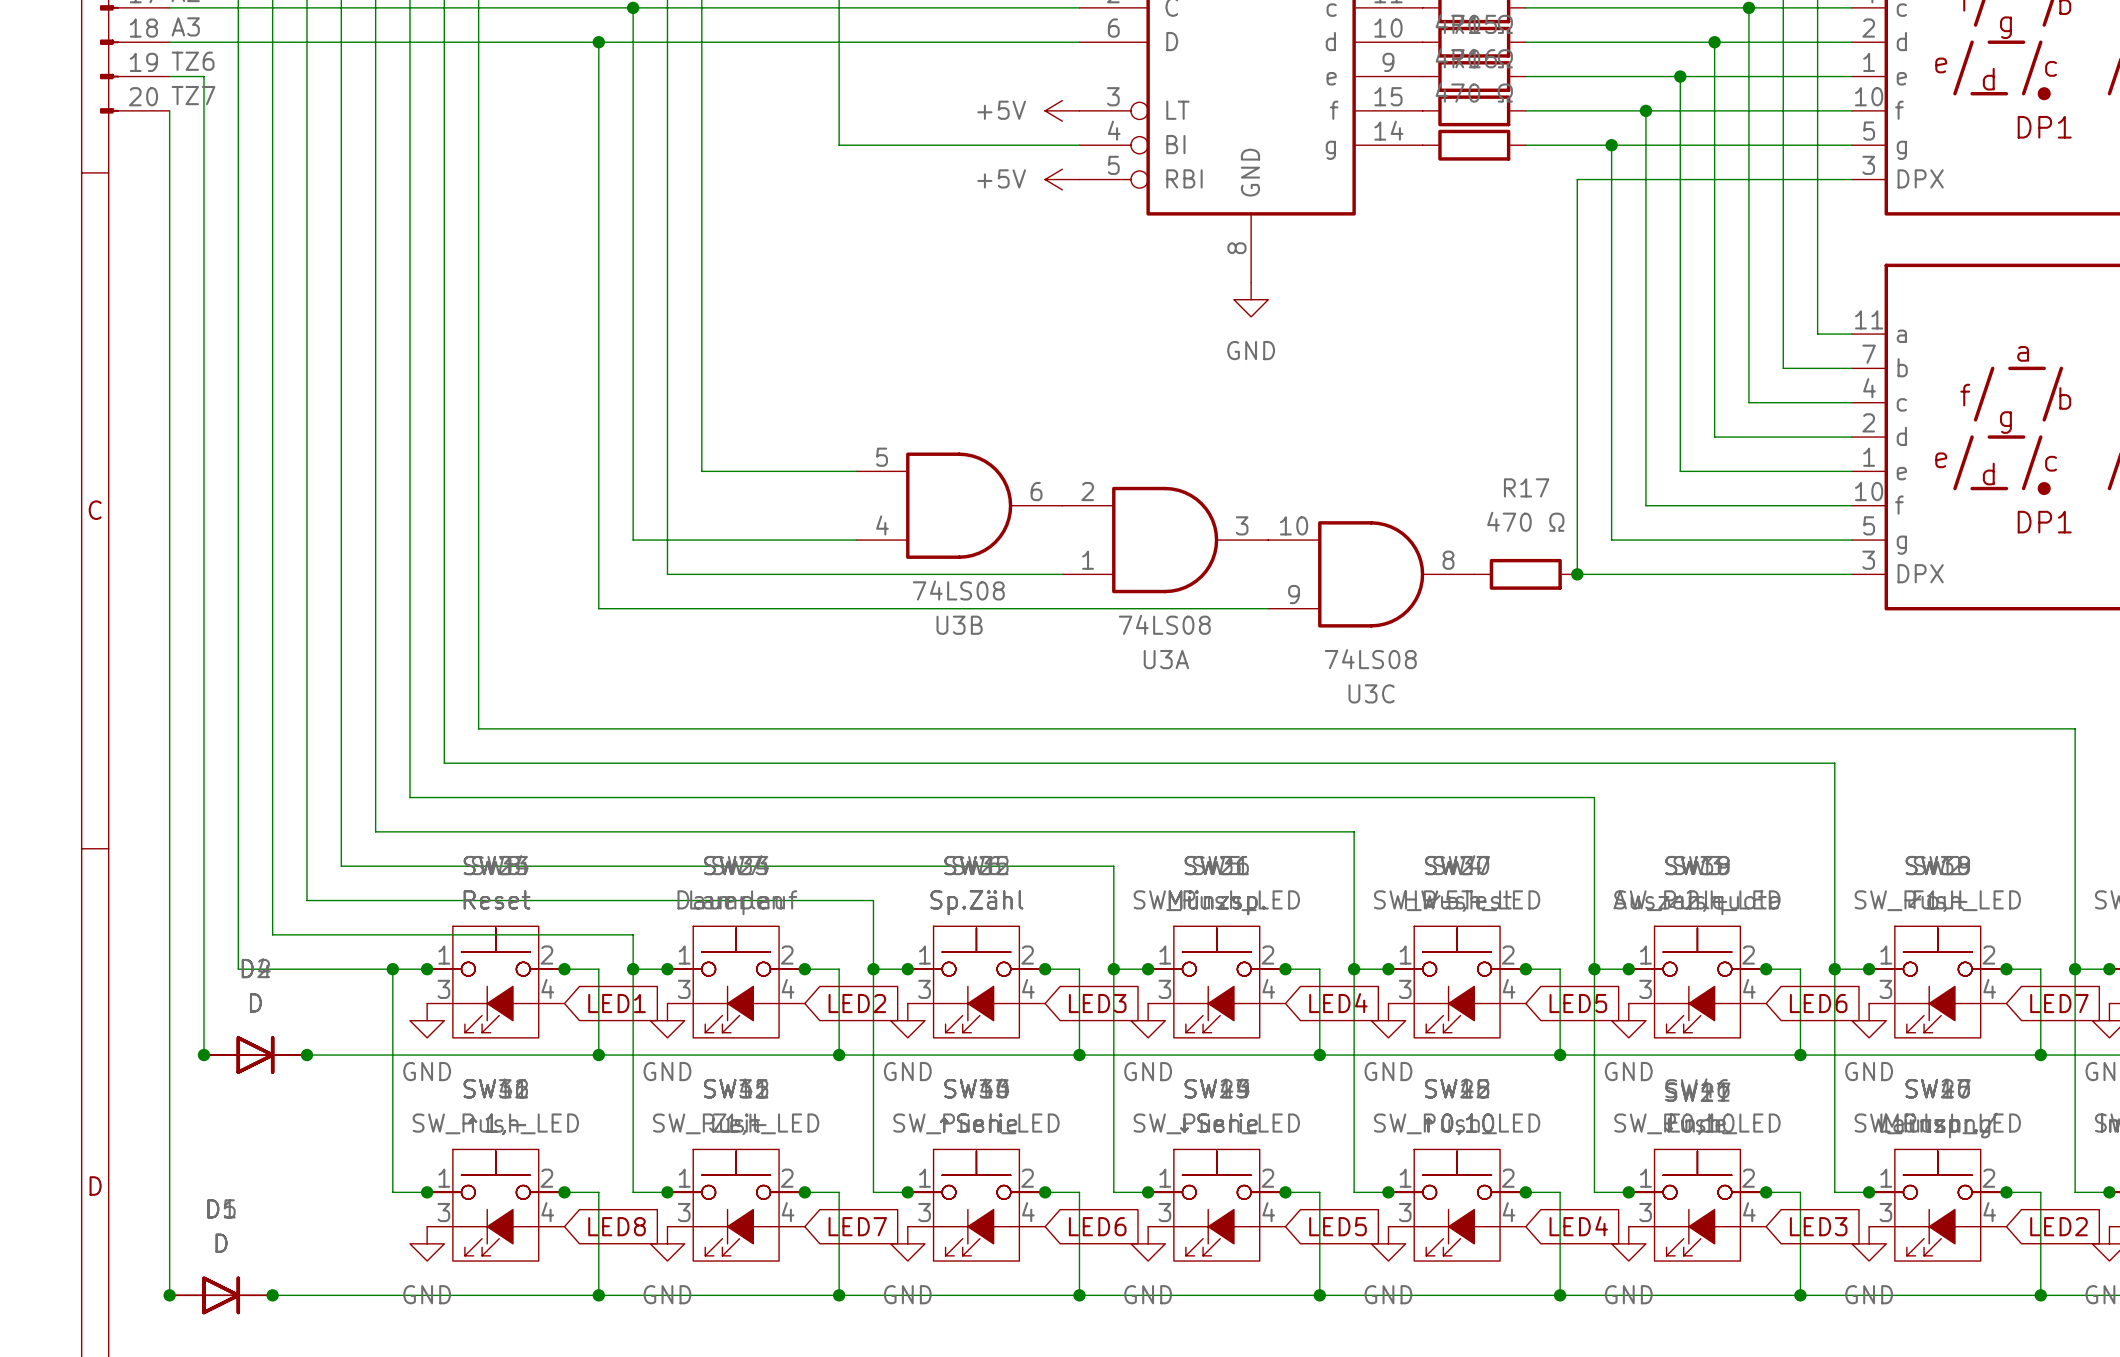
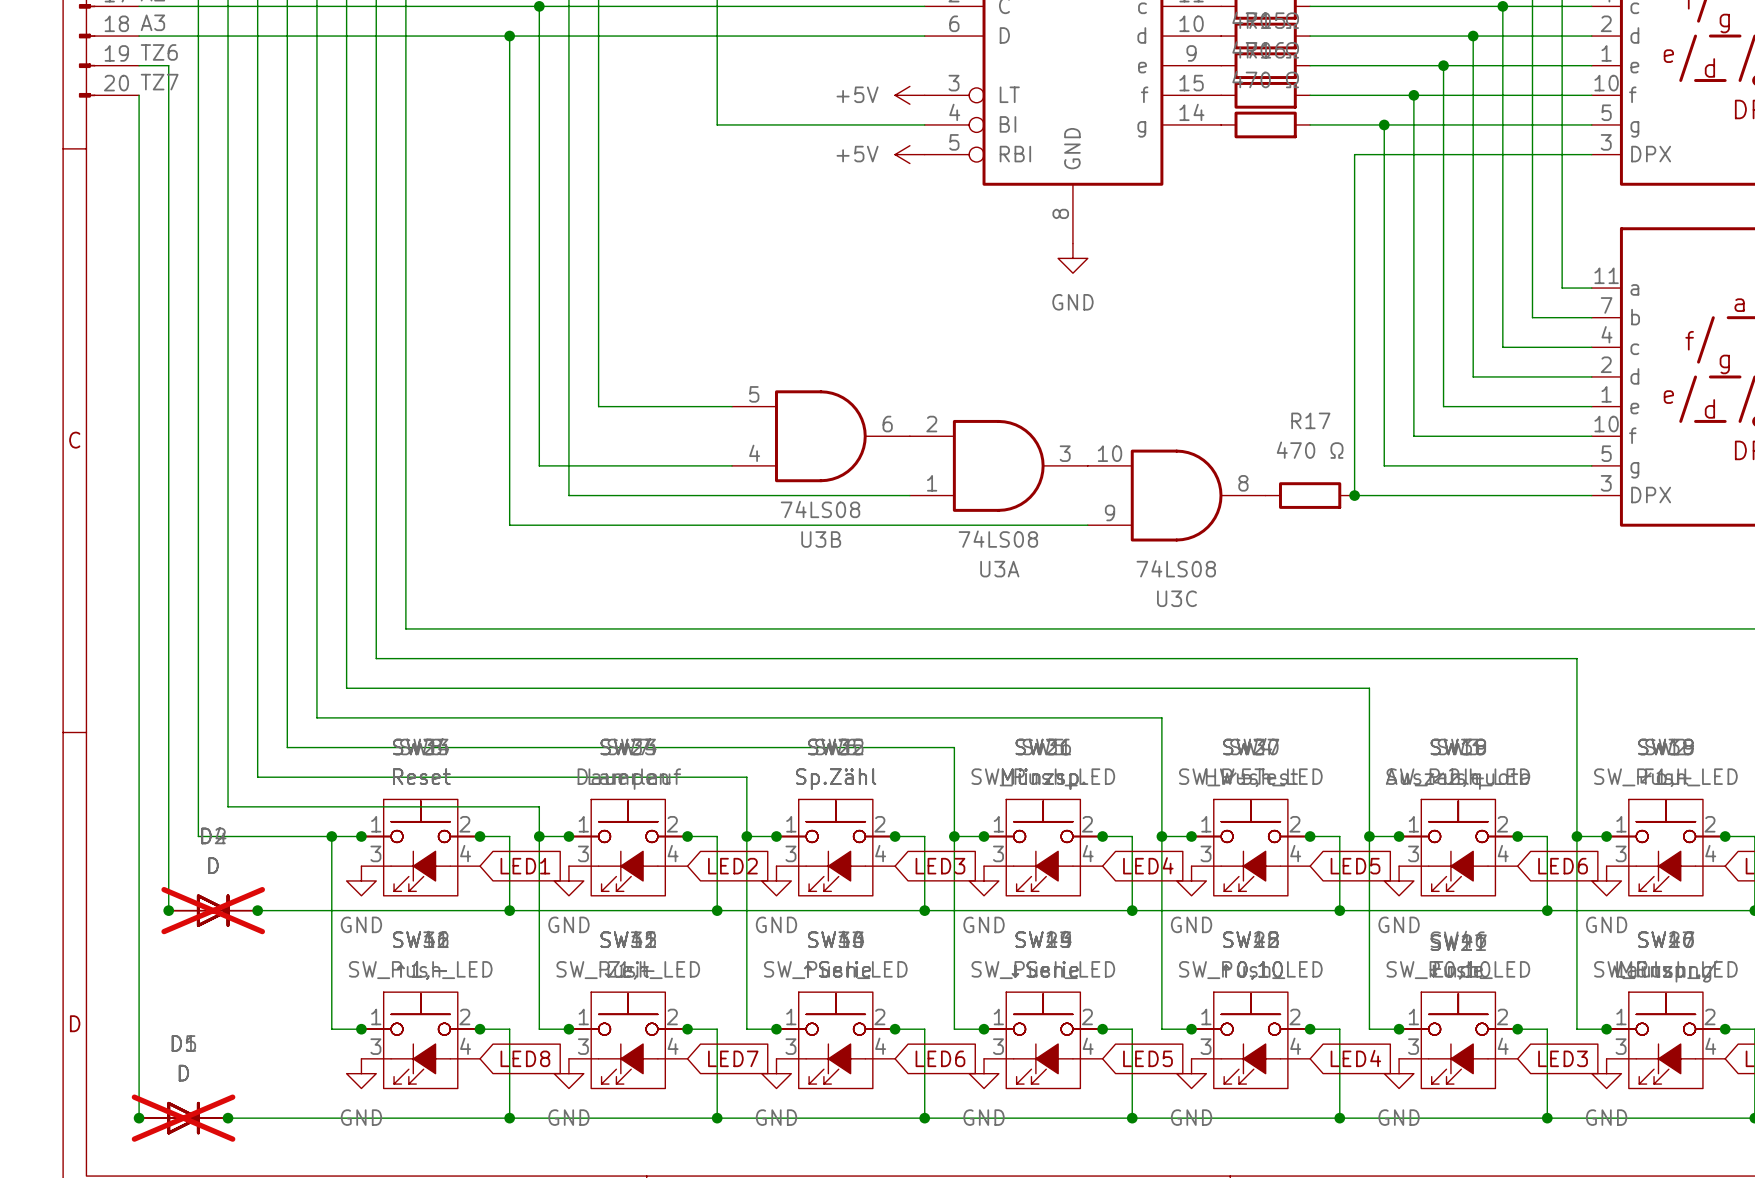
part do-not-place cross: none -> (213, 910)
part do-not-place cross: none -> (183, 1118)

